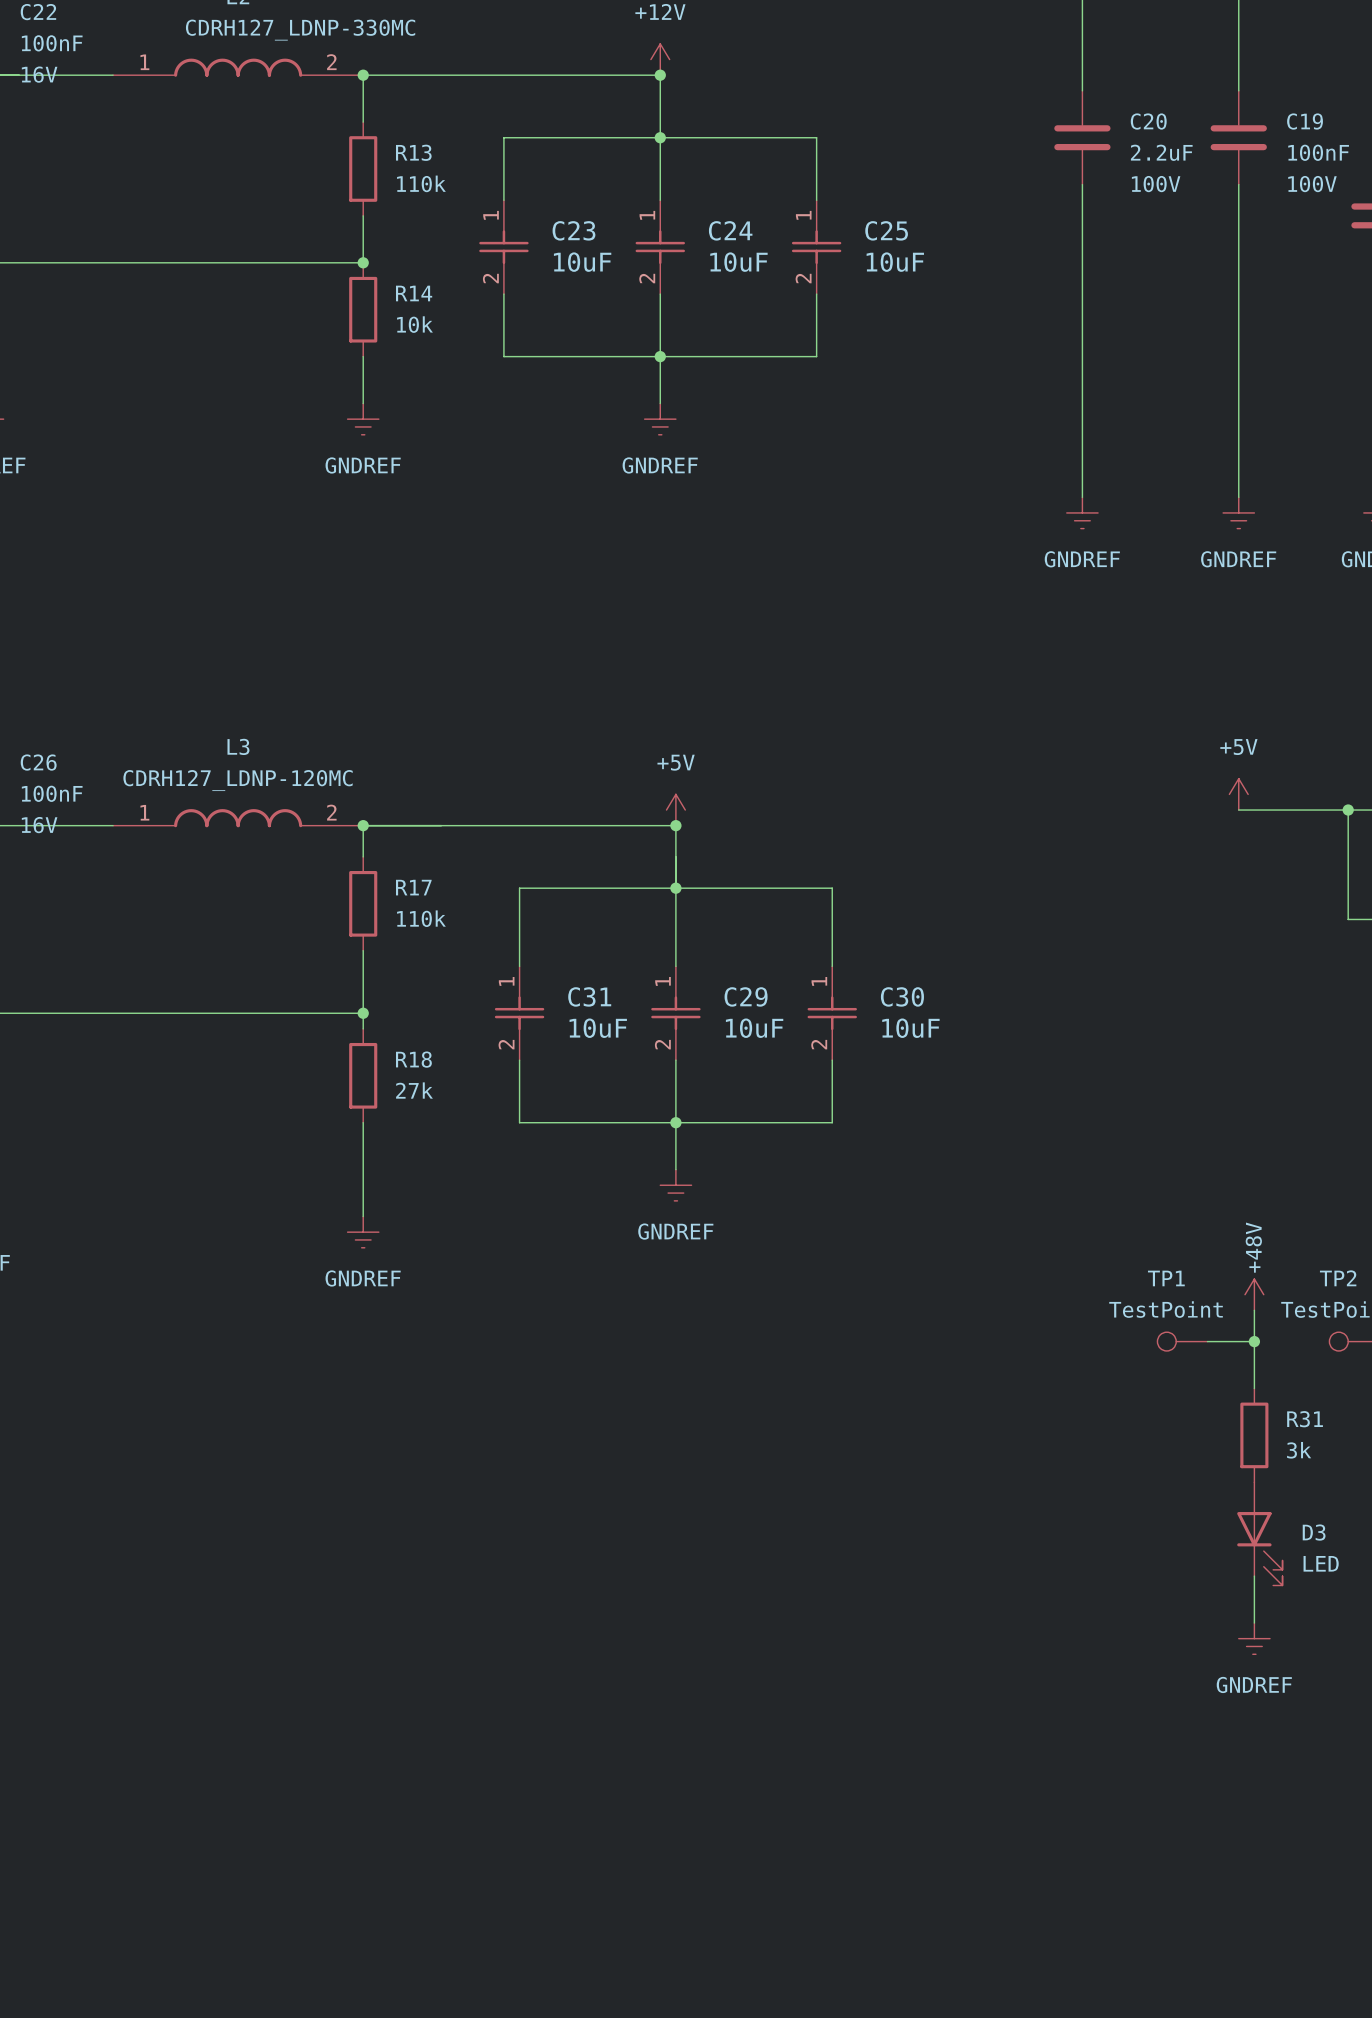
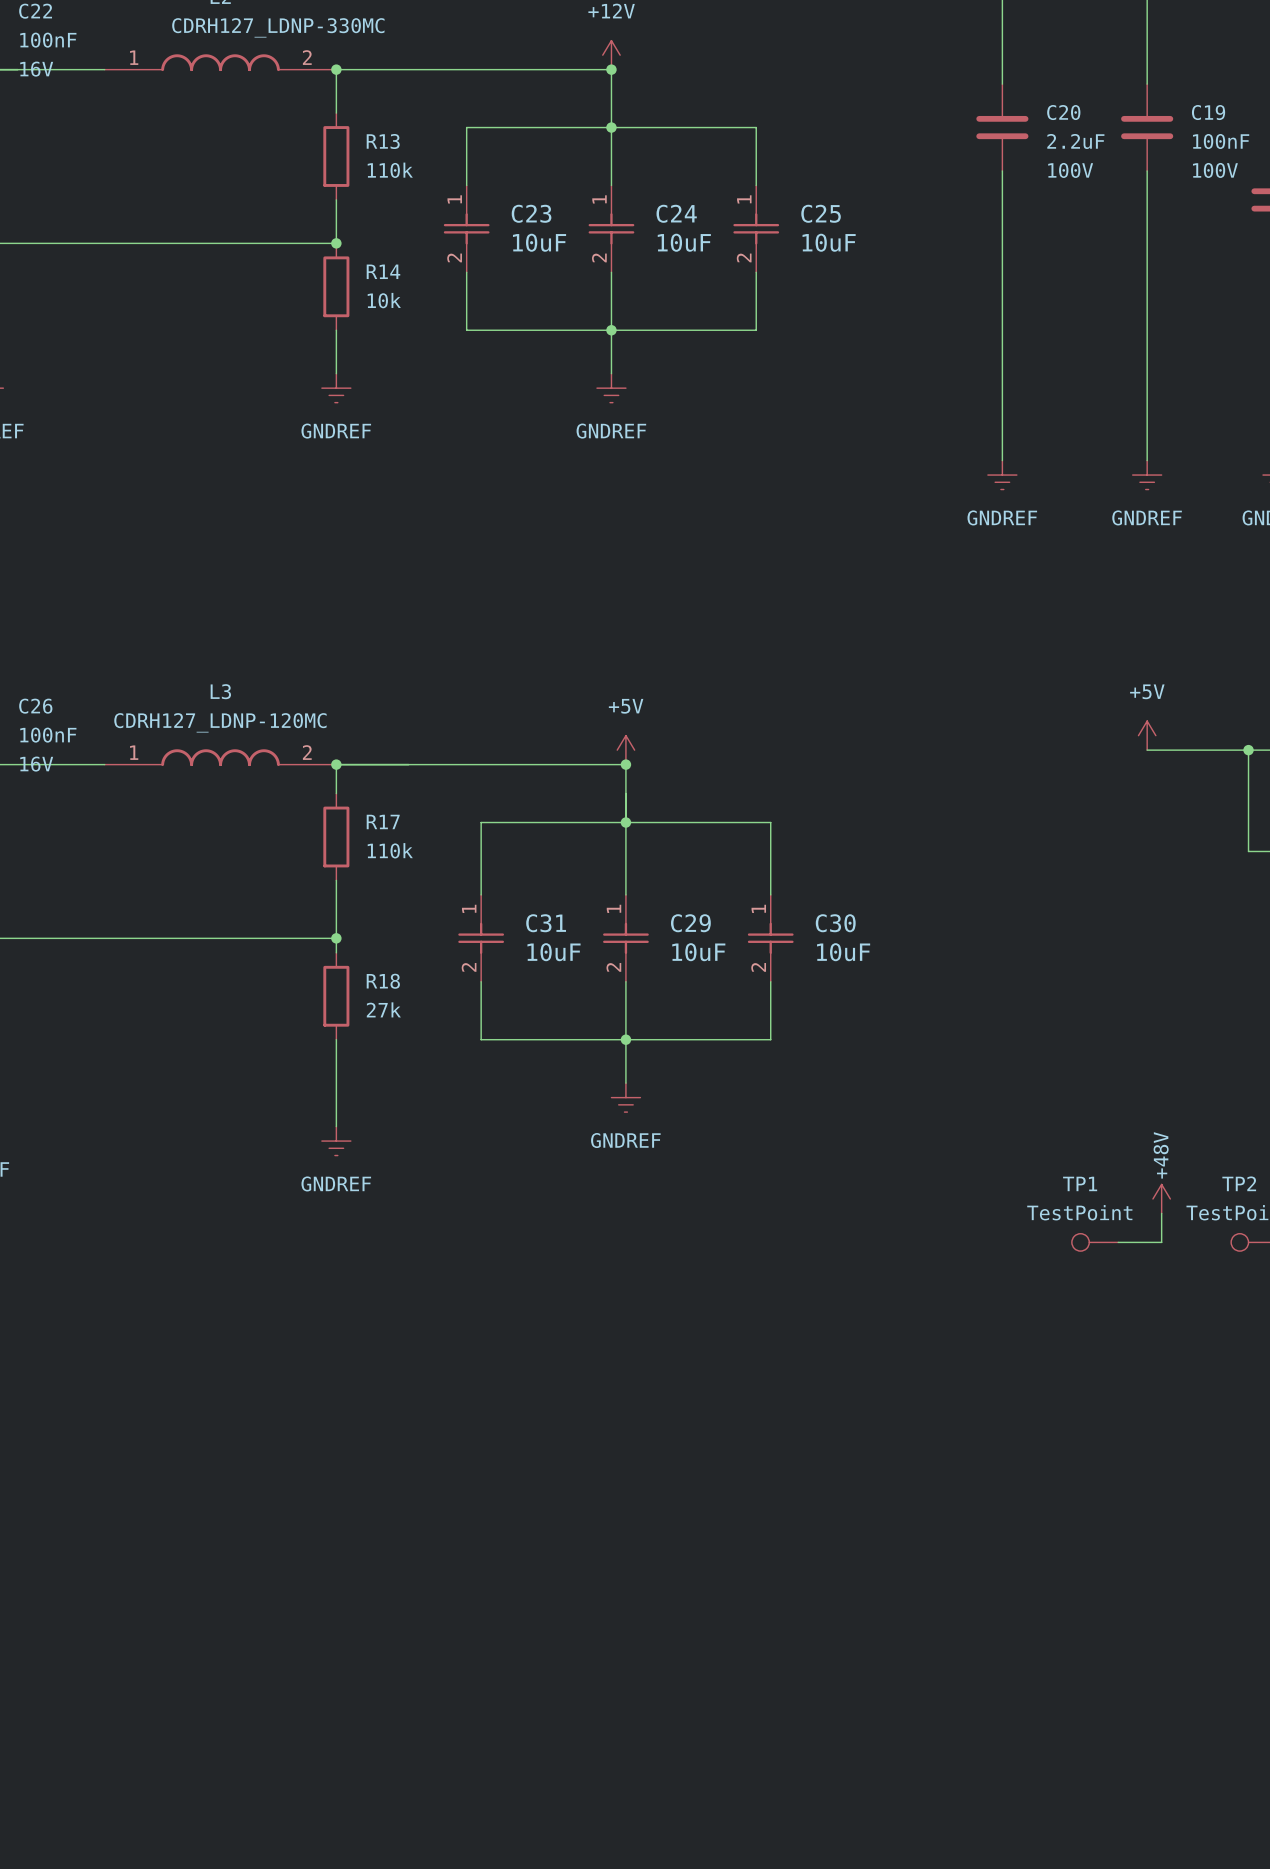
wire: (1254, 1341) (1254, 1388) -> none
junction: (1254, 1341) -> none
R31: 3k (1254, 1435) -> none
D3: LED (1259, 1533) -> none
wire: (1254, 1576) (1254, 1623) -> none
power symbol: GNDREF (1254, 1638) -> none

